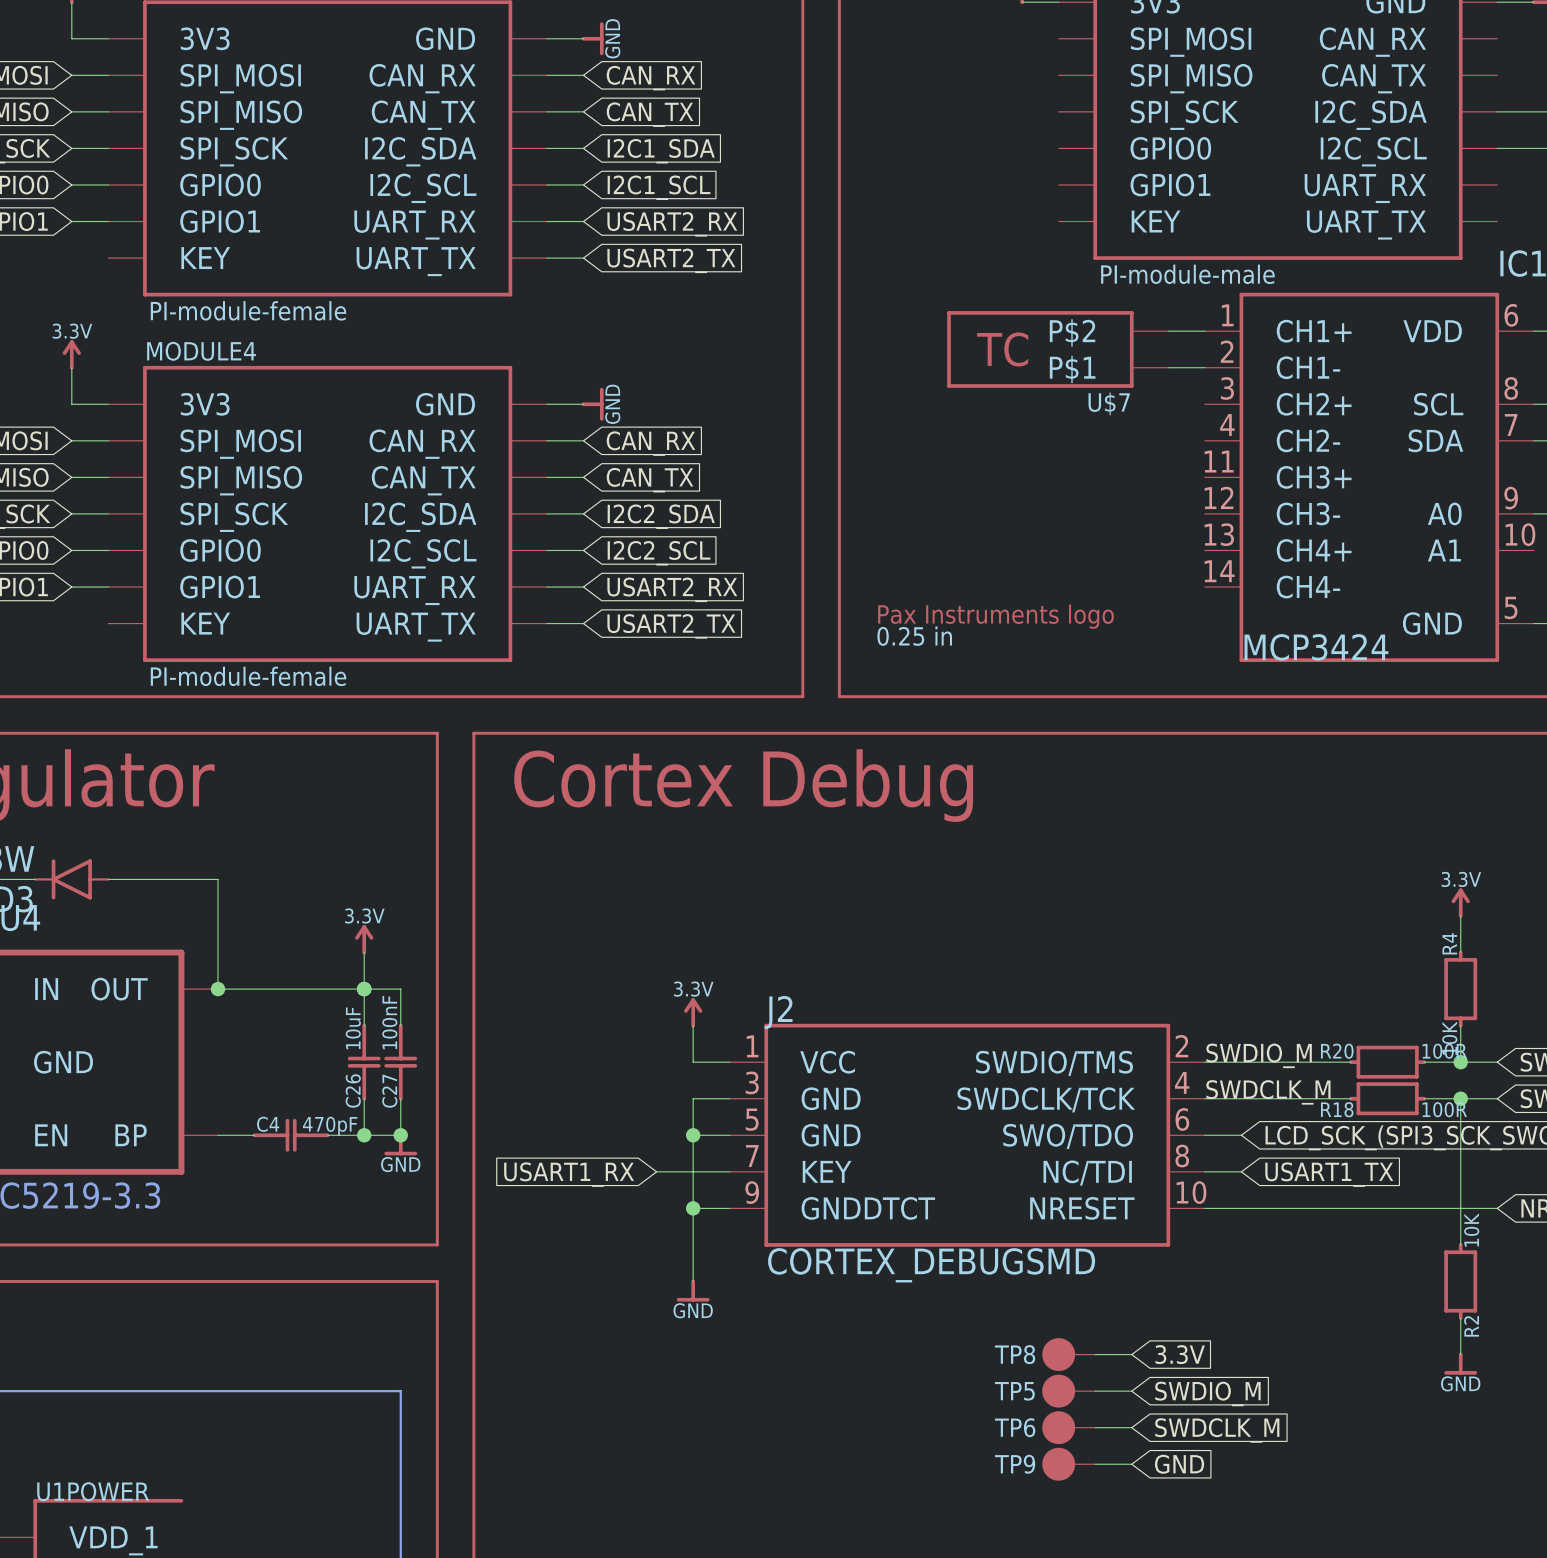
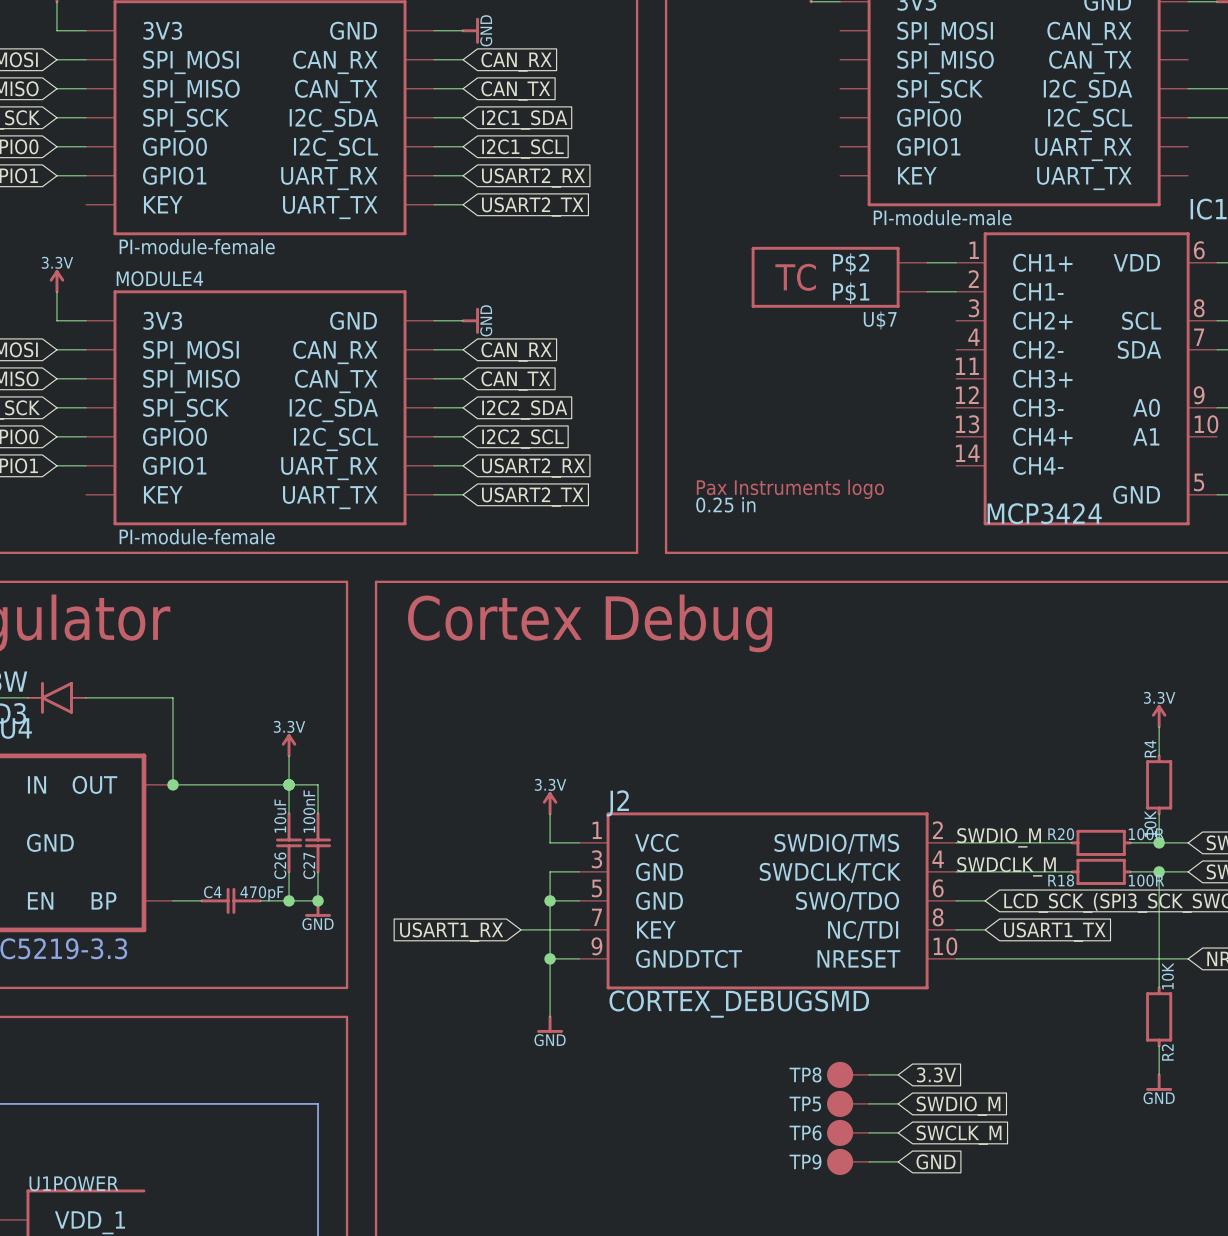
global label: SWDCLK_M (1217, 1430) -> SWCLK_M (959, 1135)

